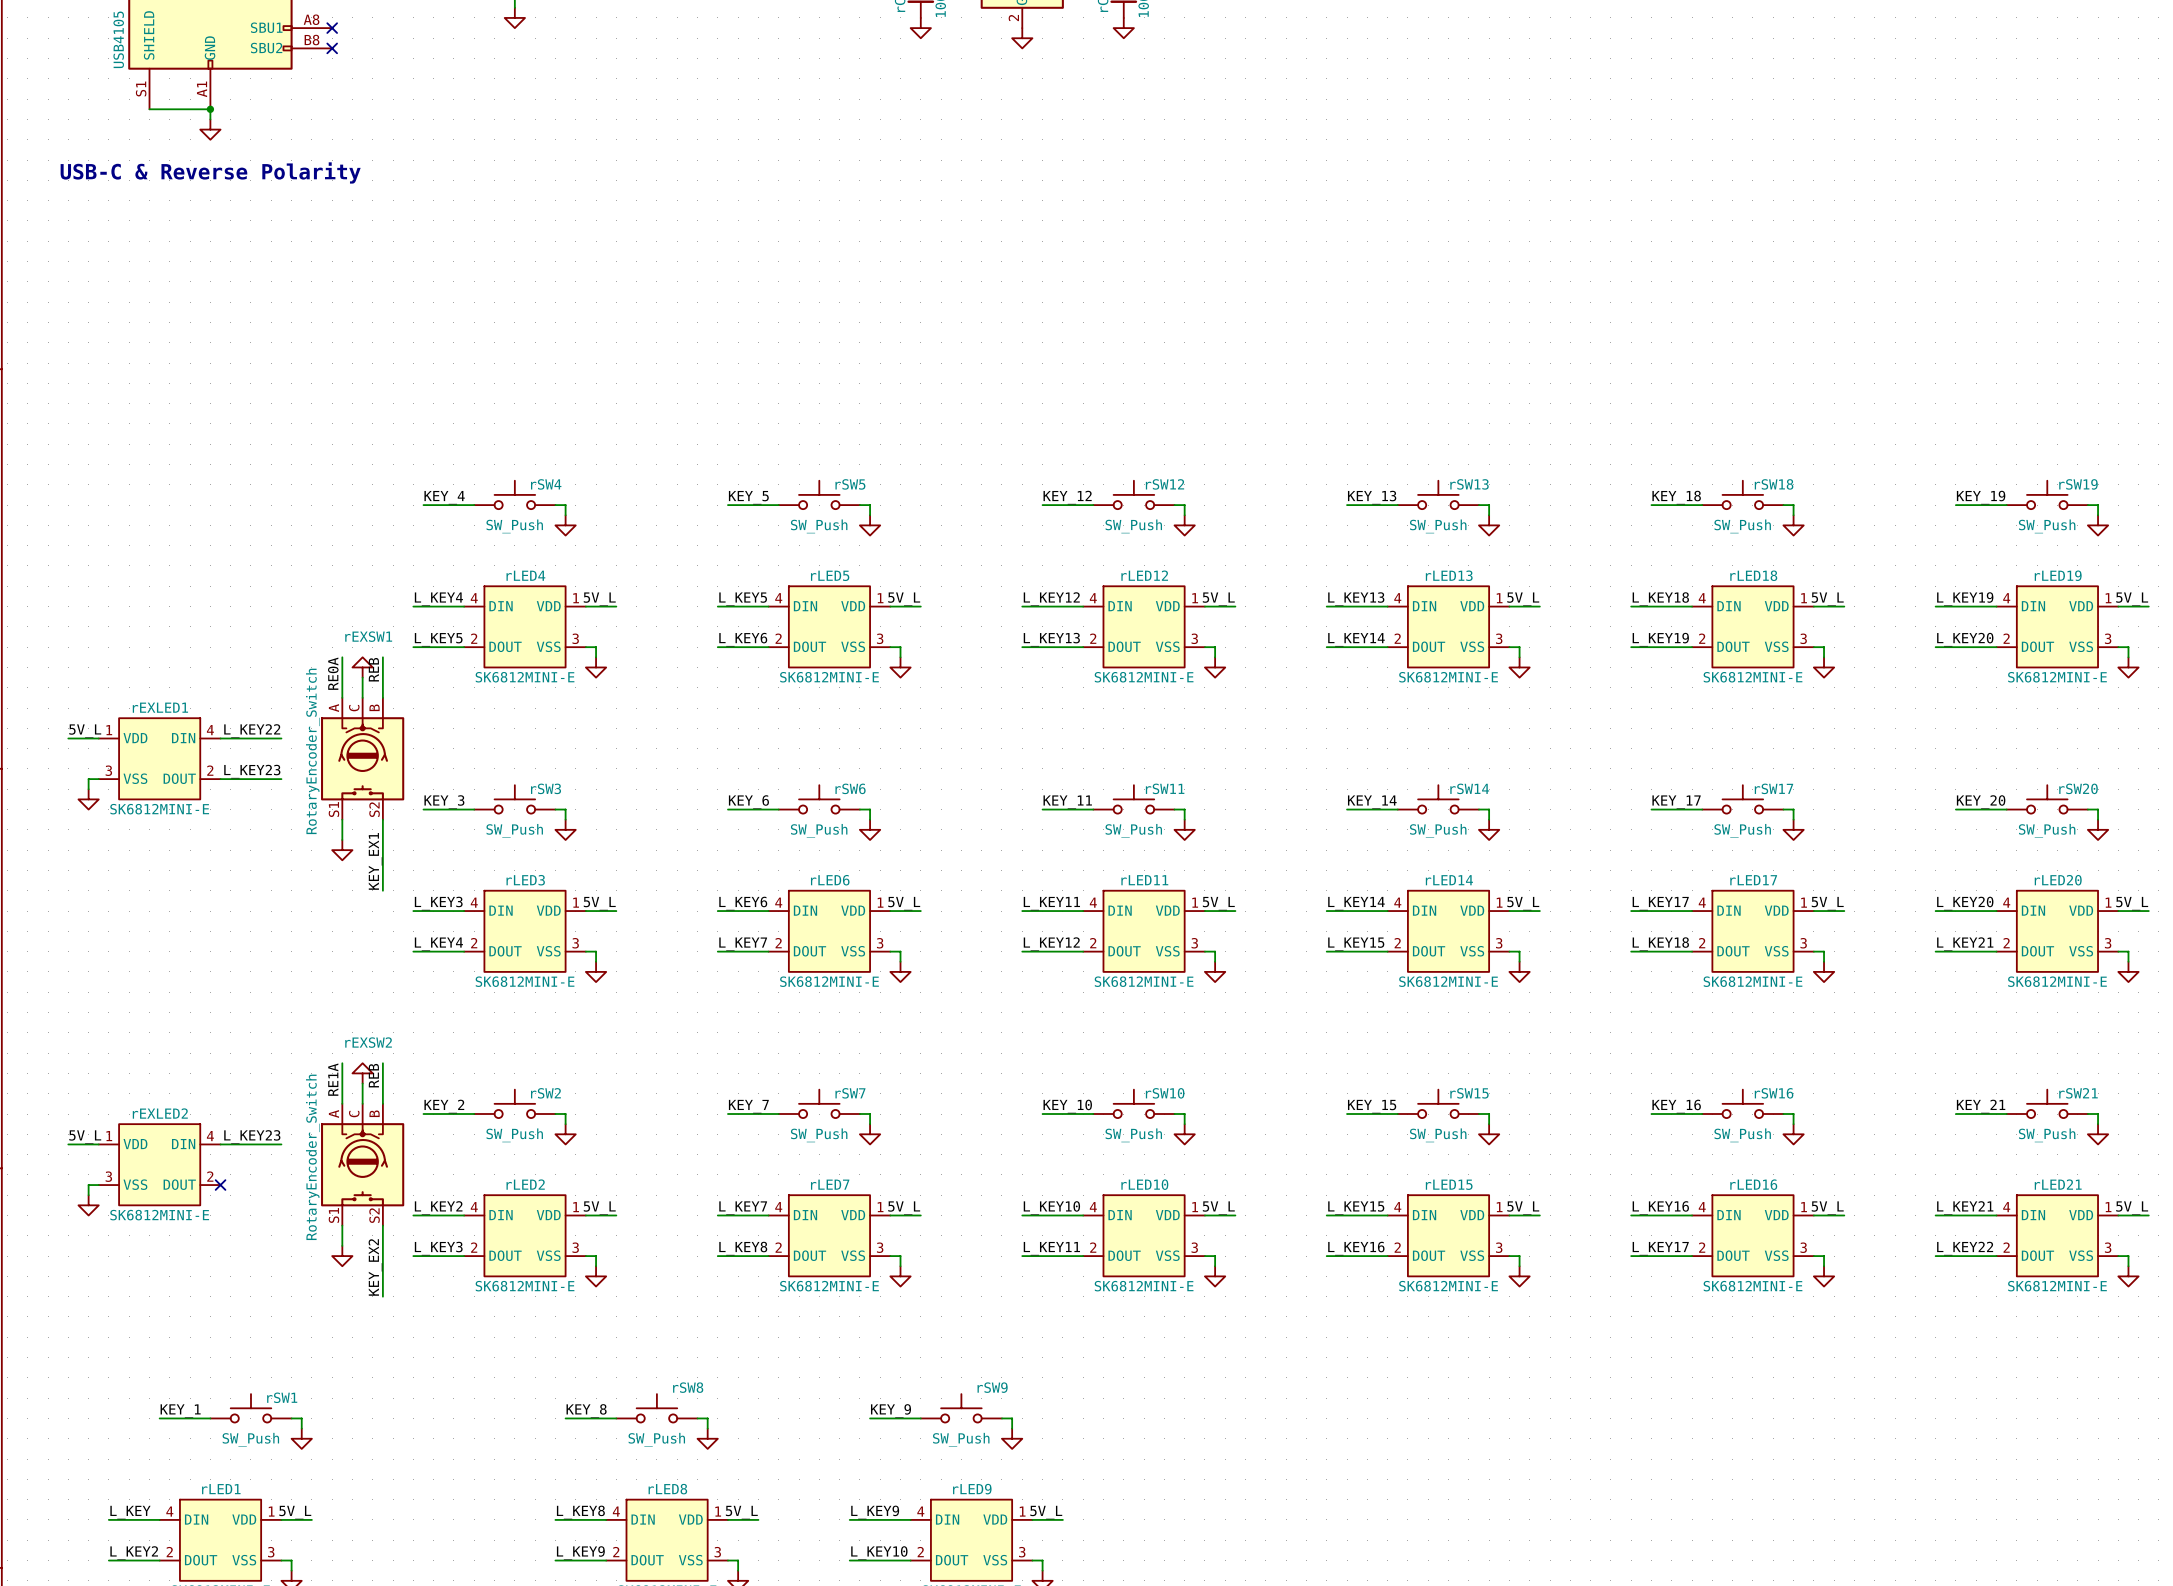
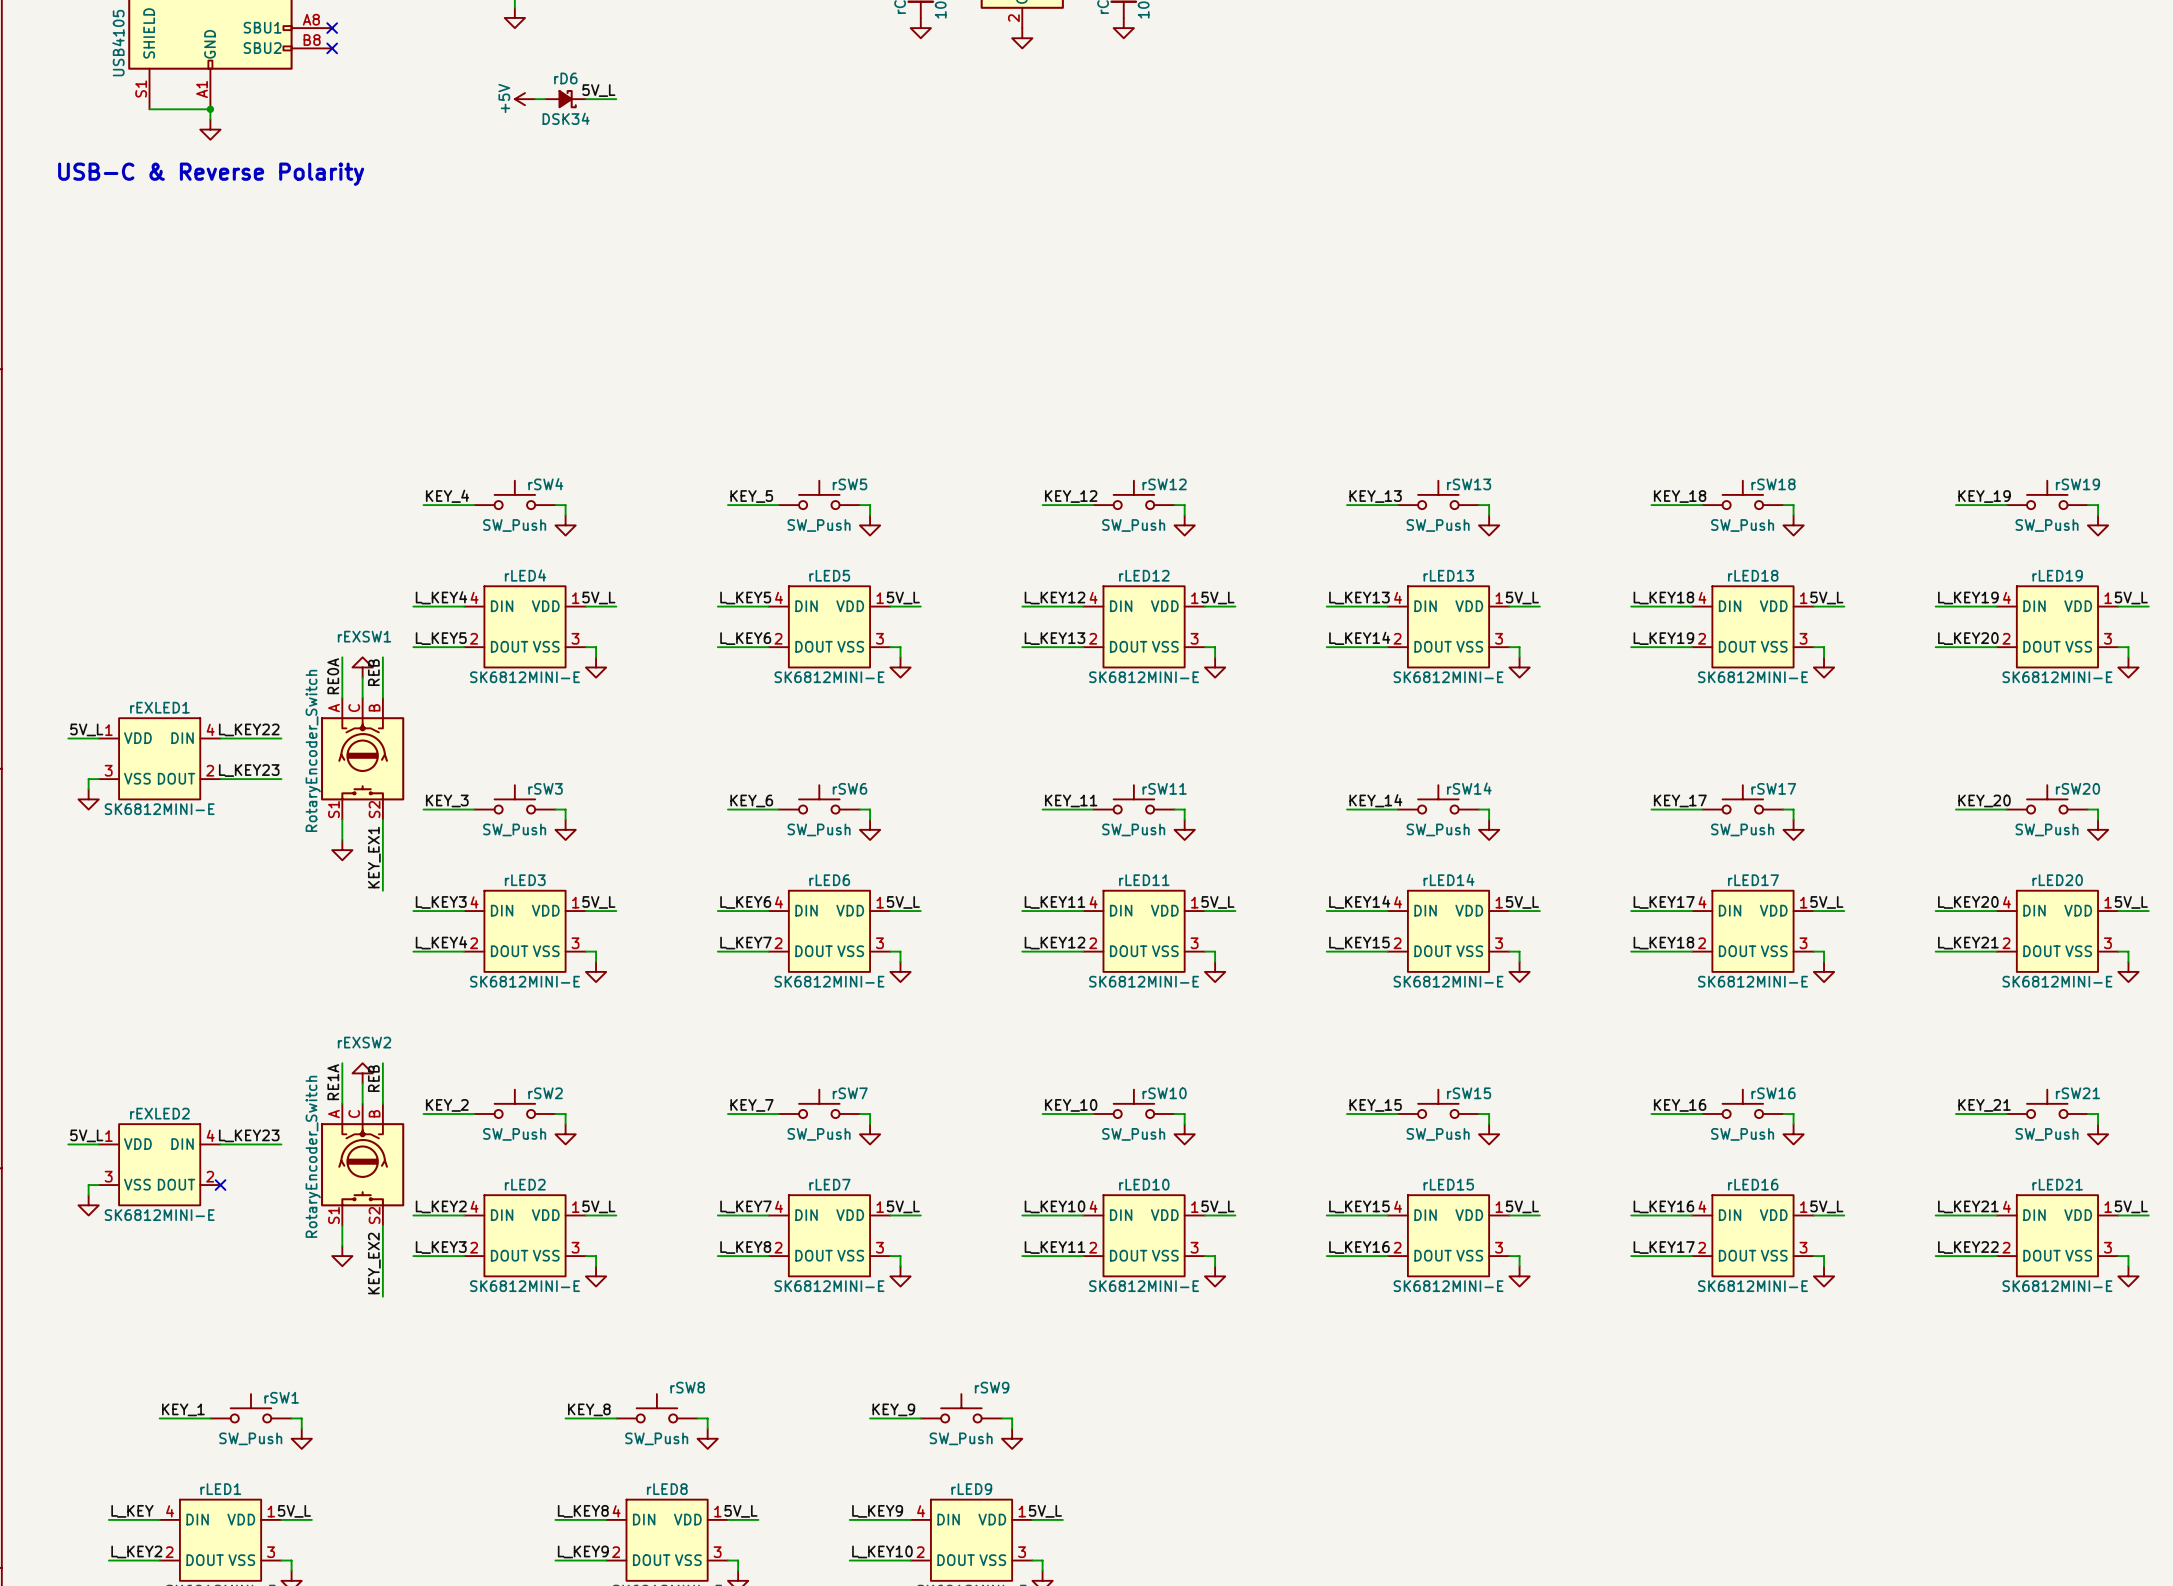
label: none -> 5V_L (598, 90)
power symbol: none -> +5V (525, 99)
wire: none -> (535, 99) (545, 99)
rD6: none -> DSK34 (565, 99)
wire: none -> (585, 99) (616, 99)

